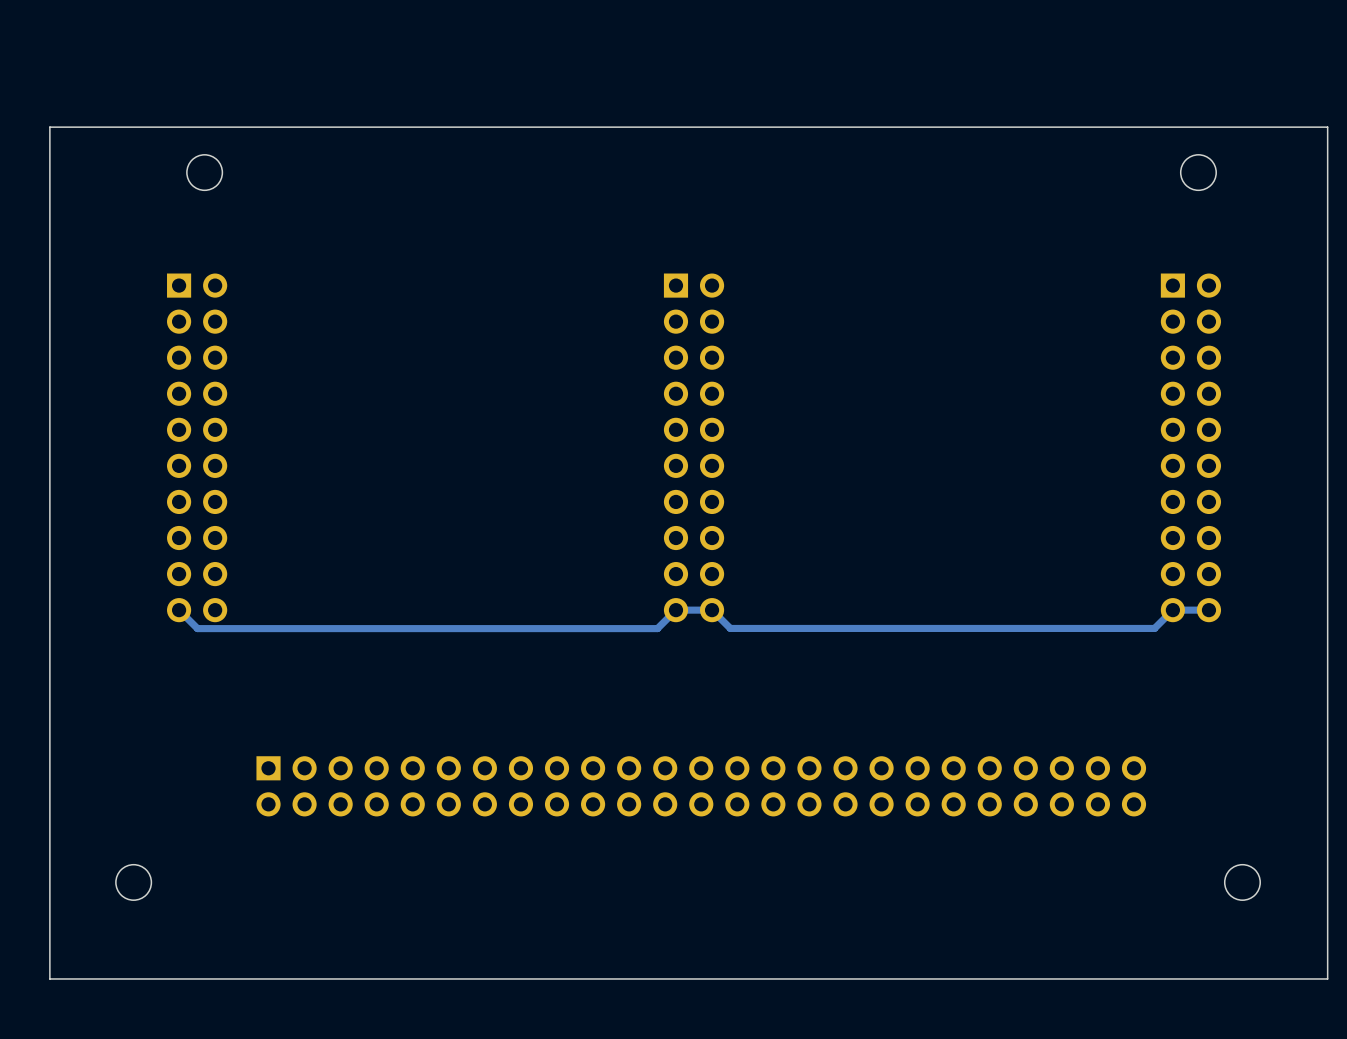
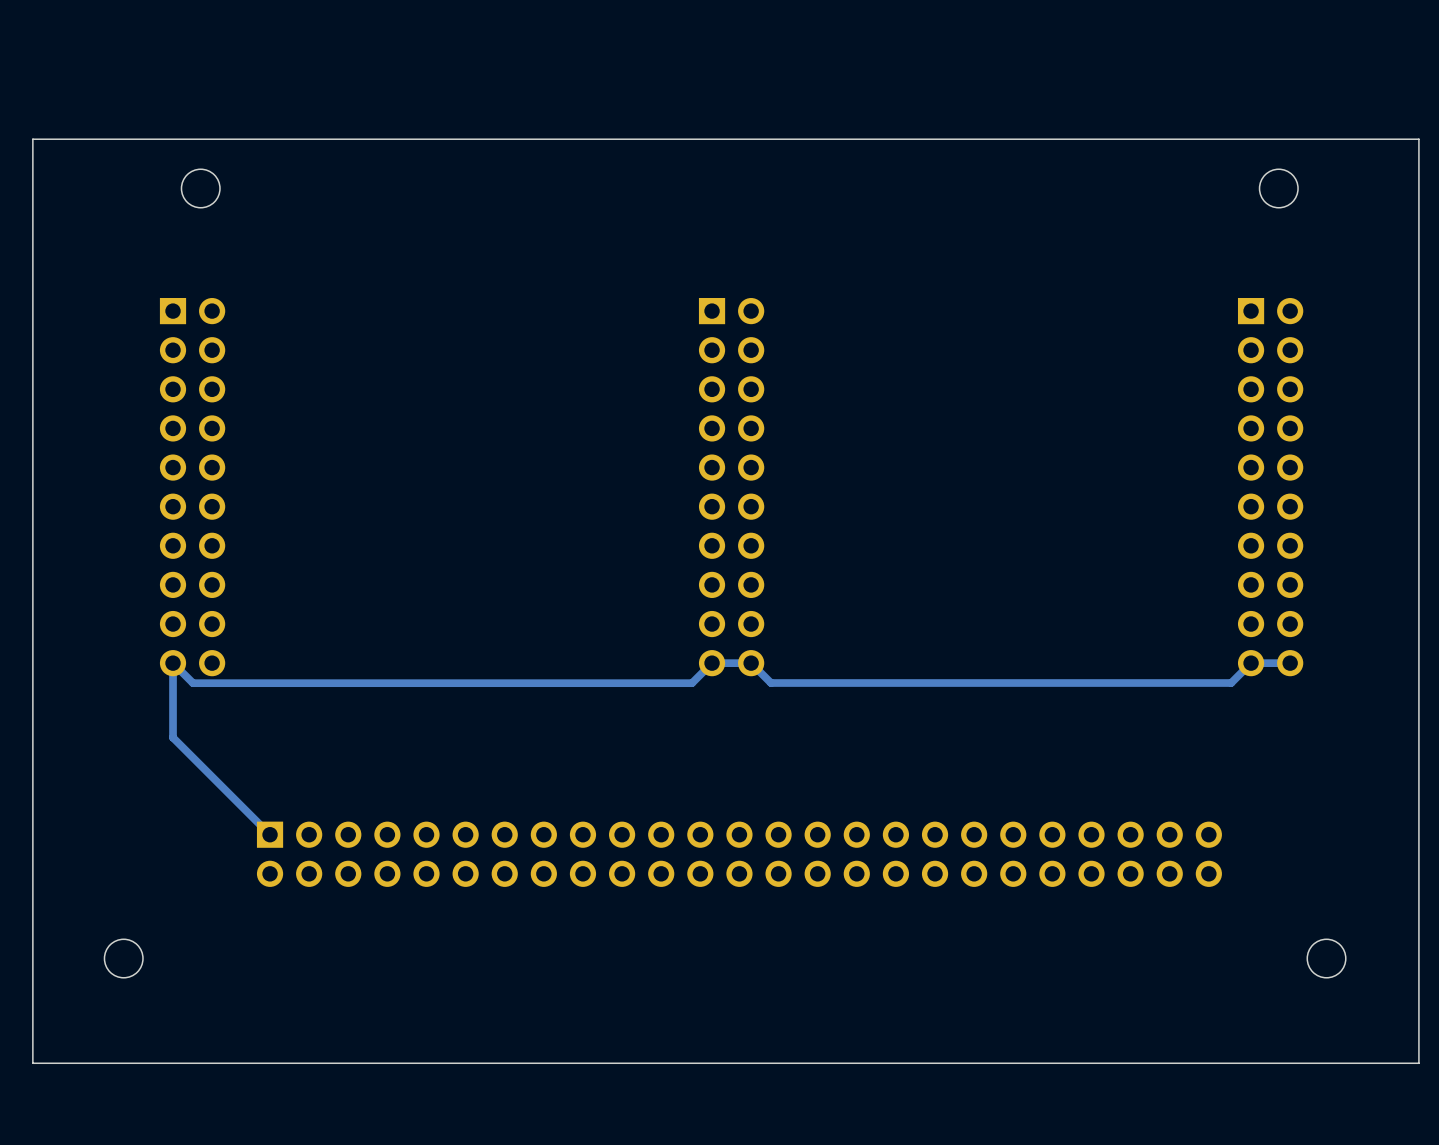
track: none -> (173, 663) (173, 737) (270, 834)

